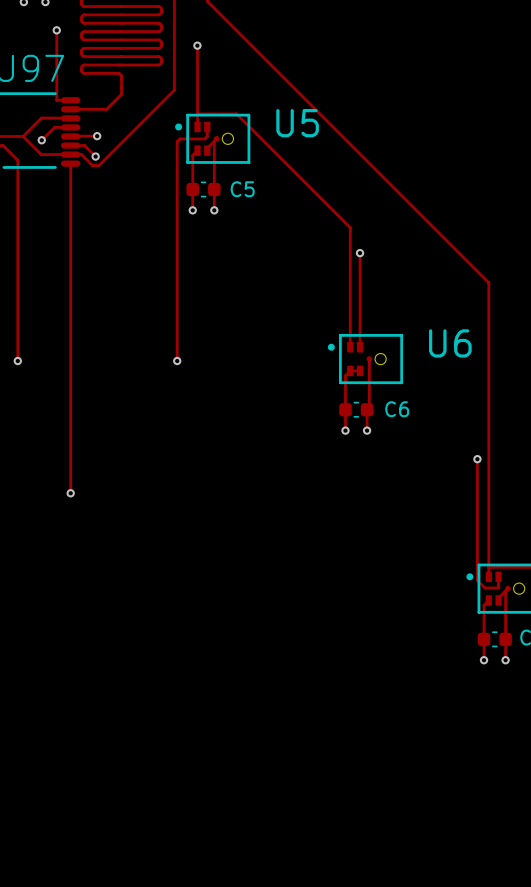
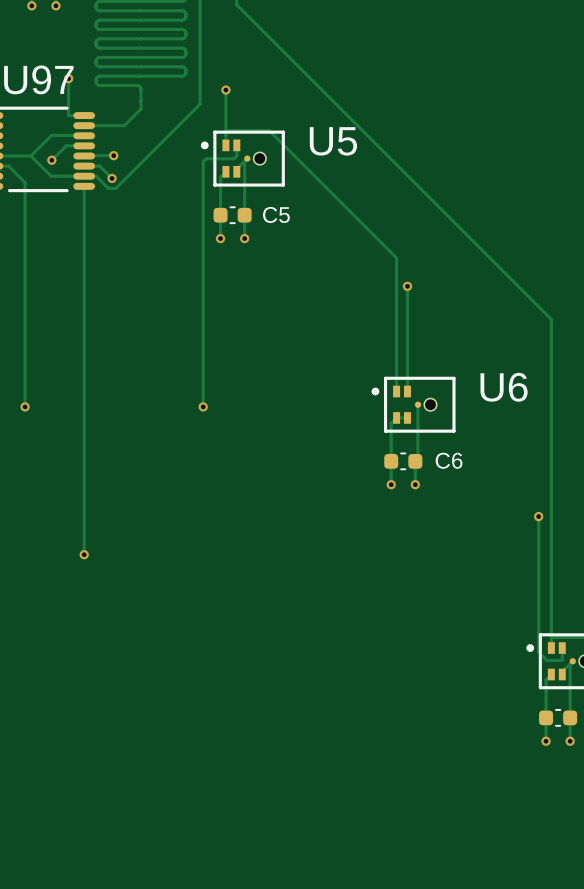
track: (56, 30) (56, 67) -> none
via: (56, 30) -> none
track: (197, 45) (197, 77) -> none
via position: (197, 45) -> (225, 90)
via: none -> (68, 78)

